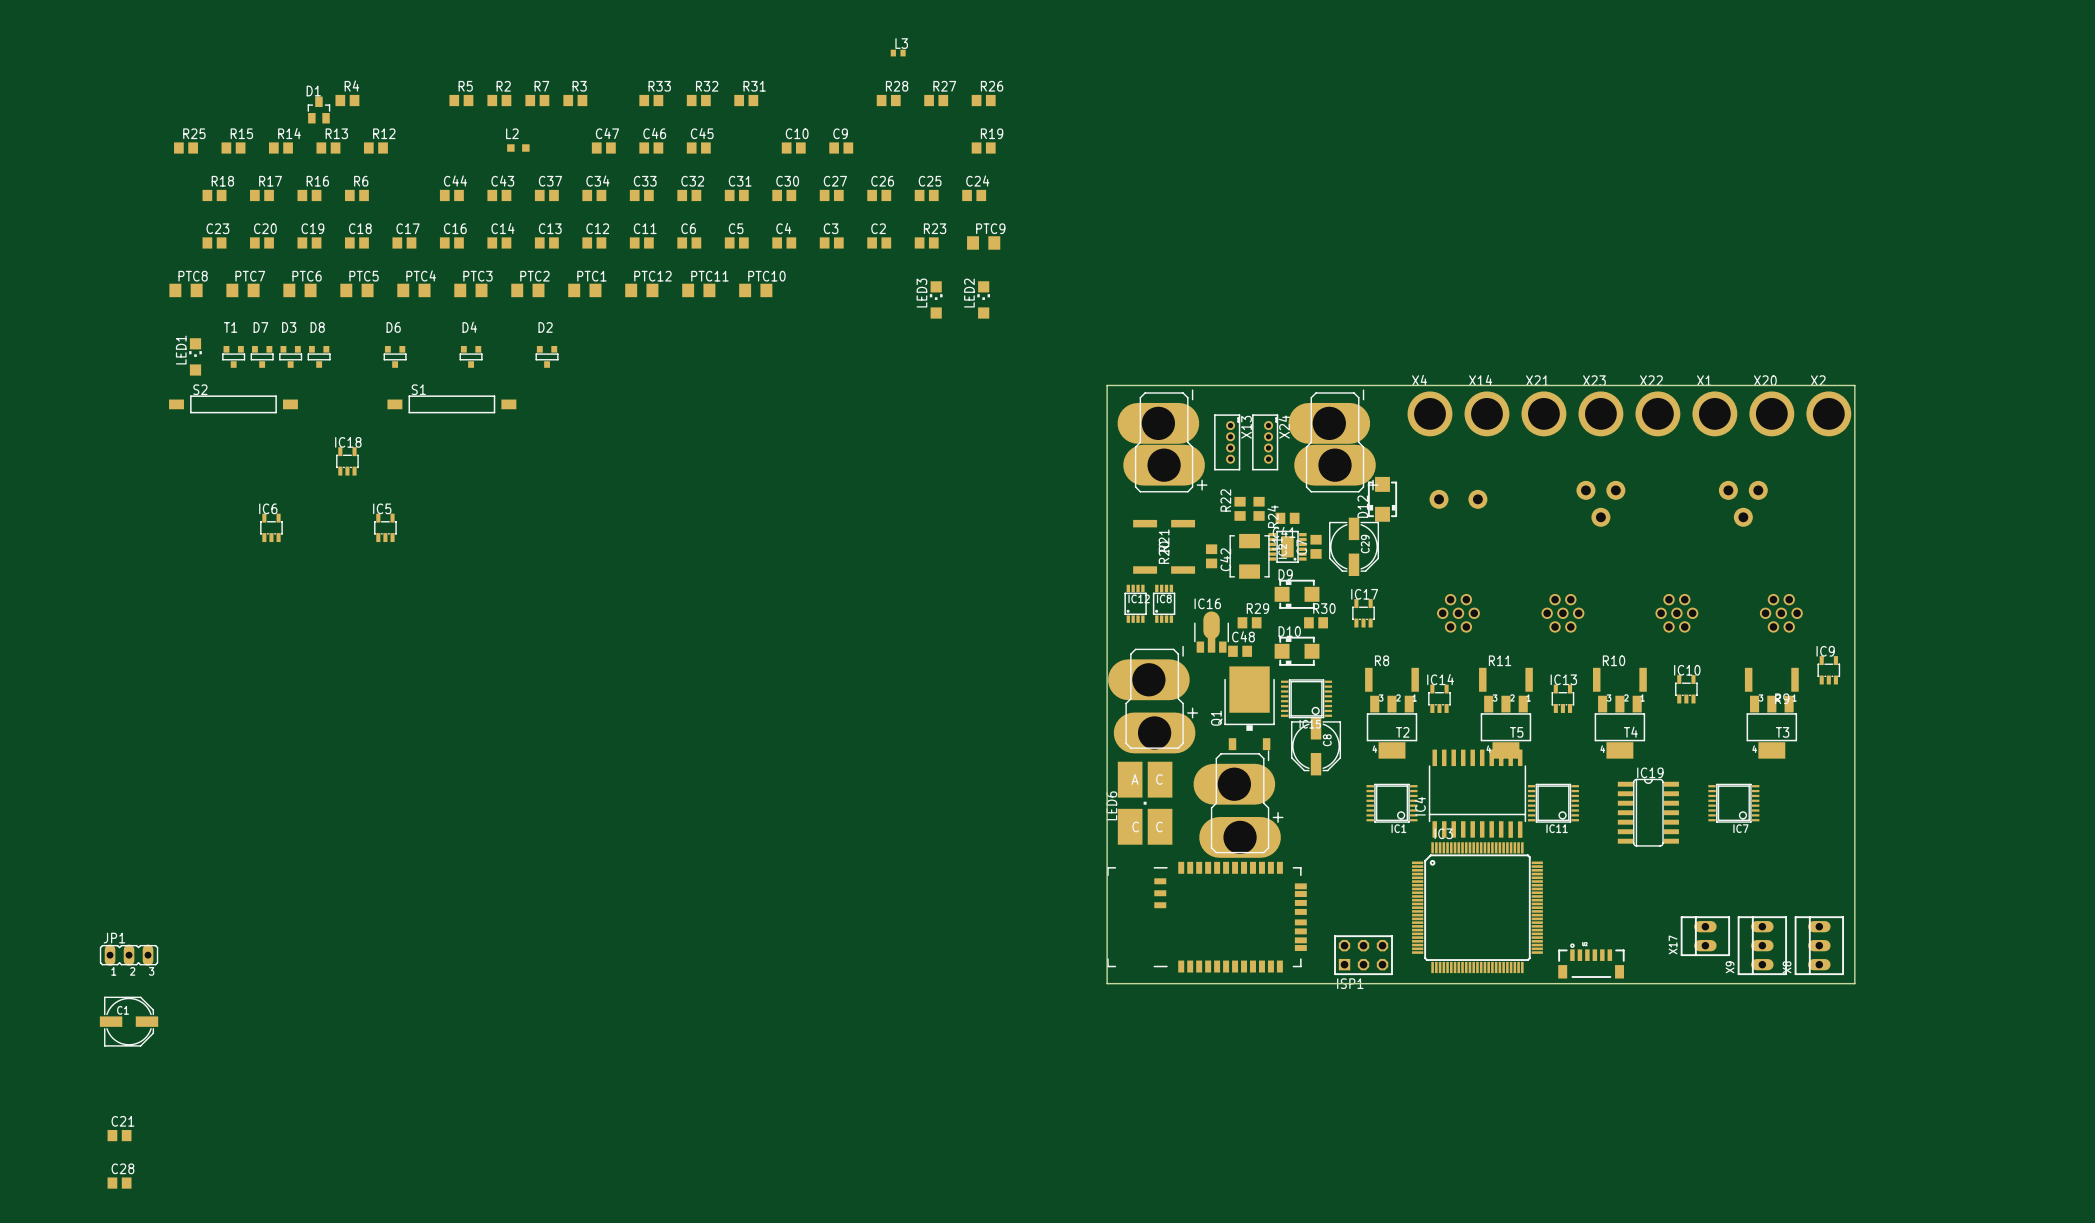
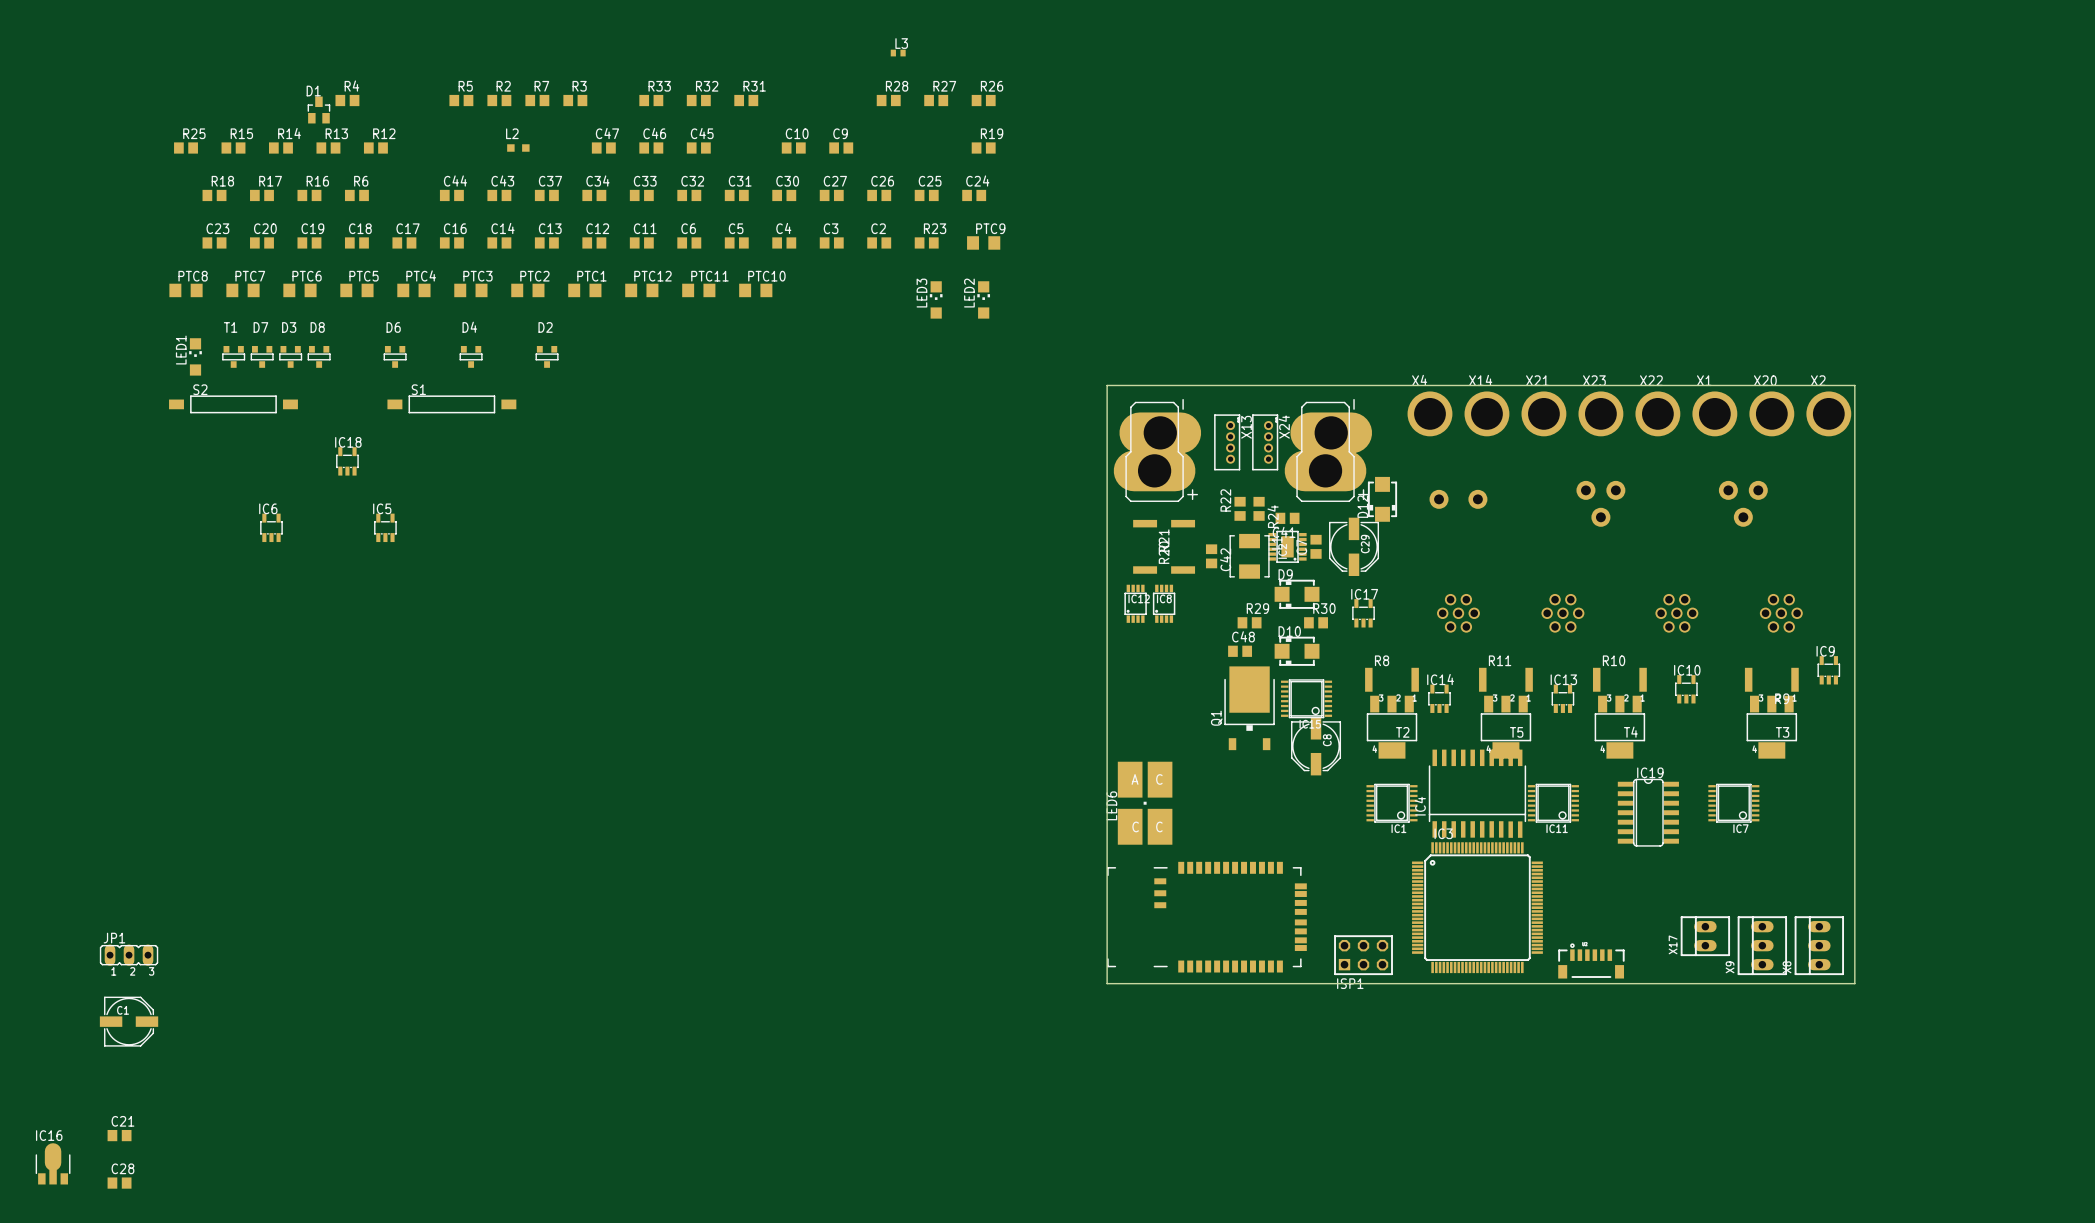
part: (1162, 440) -> none
part: (1333, 440) -> none
part: none -> (1157, 450)
part: none -> (1328, 450)
IC16 position: (1211, 632) -> (53, 1163)
part: (1152, 699) -> none
part: (1238, 804) -> none

